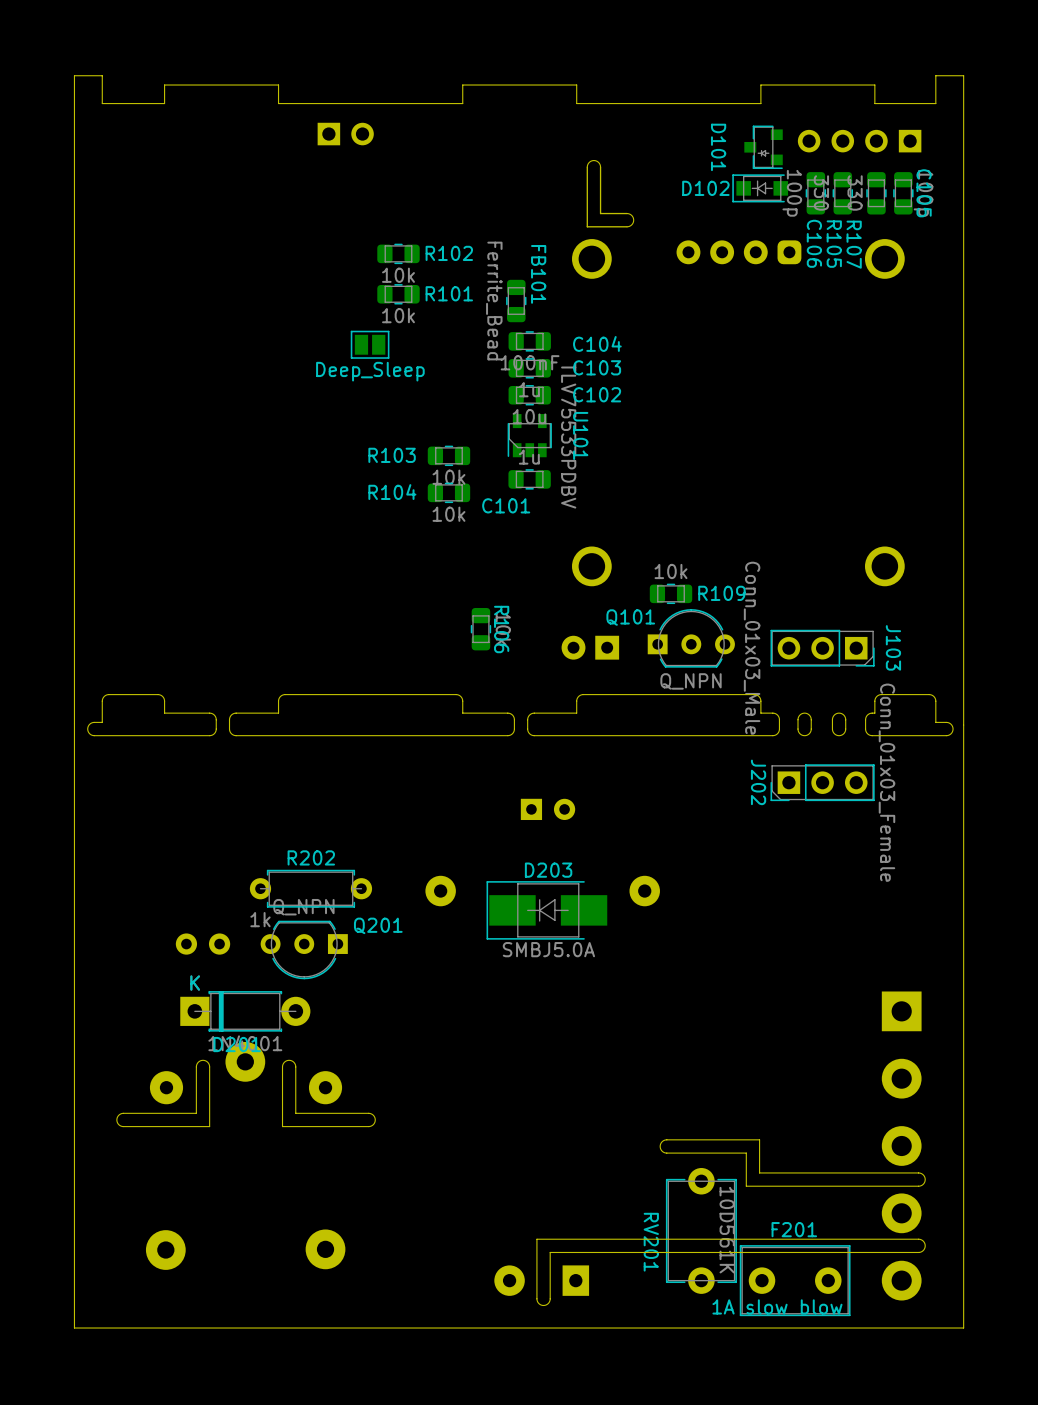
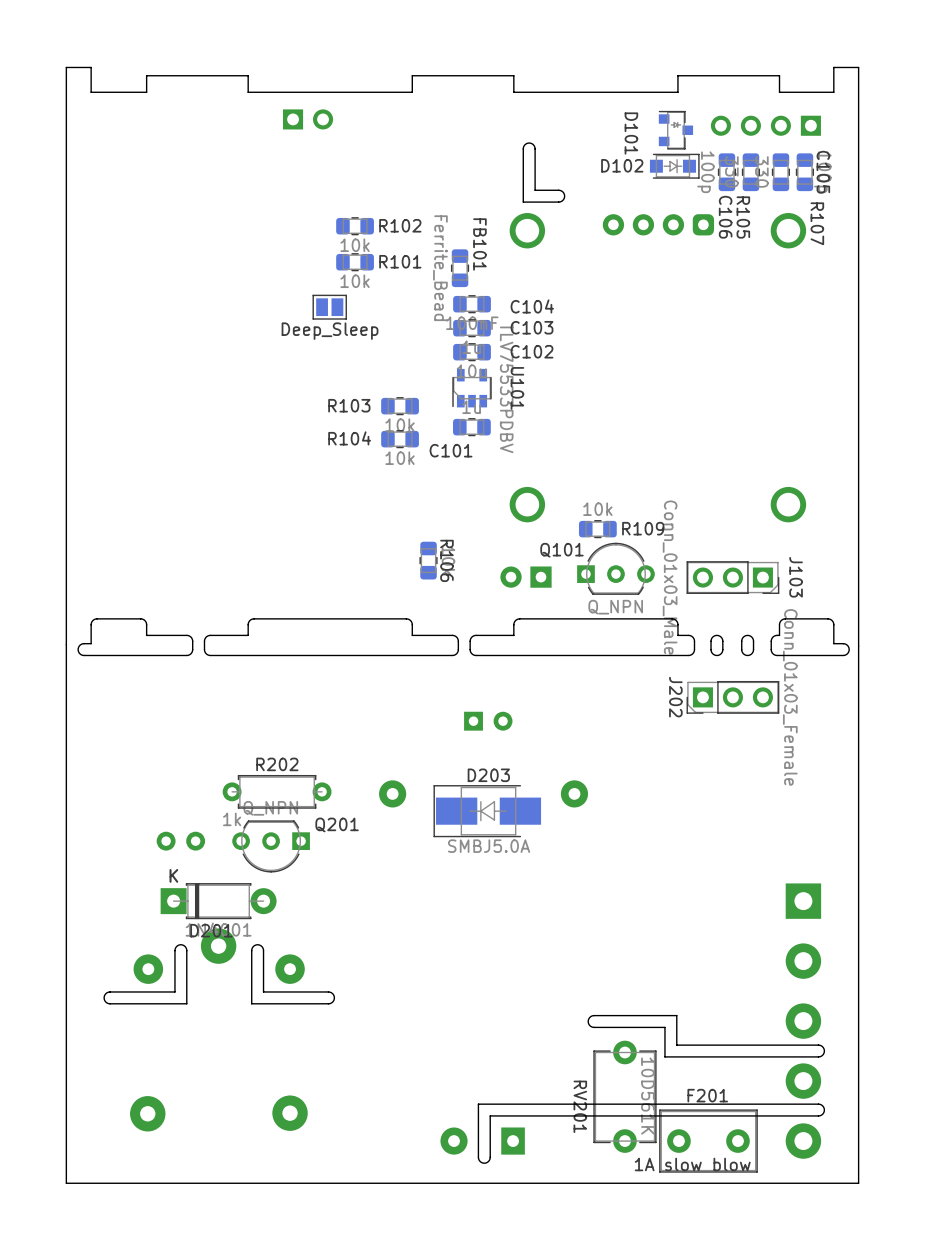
D101 rotation: 0° (763, 147) -> 180° (675, 130)
D102 rotation: 0° (760, 188) -> 180° (674, 166)
R107 name position: R107 (854, 244) -> R107 (817, 223)

